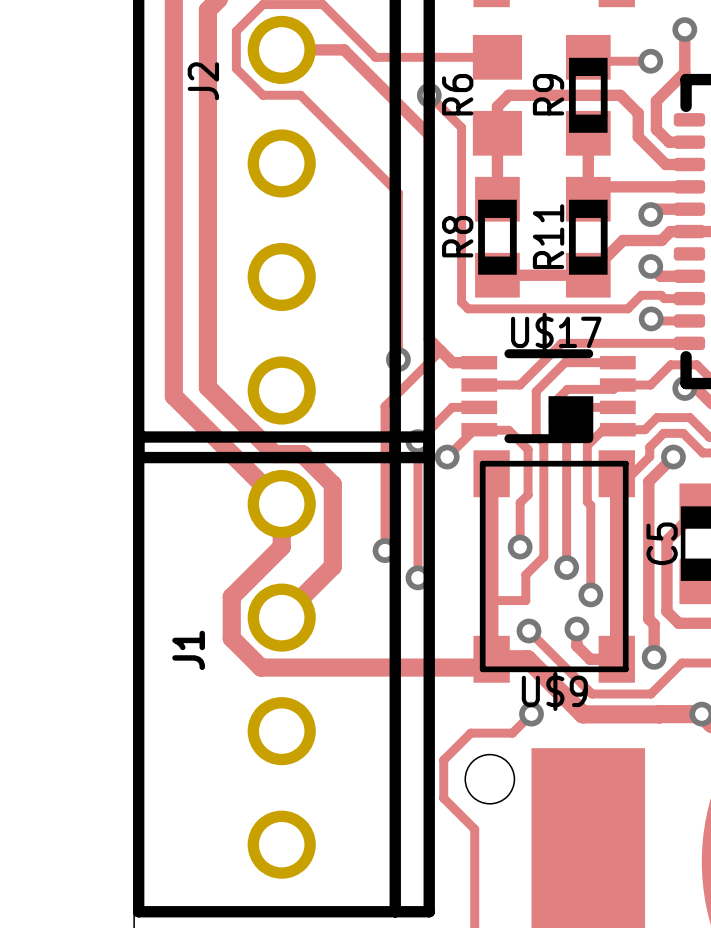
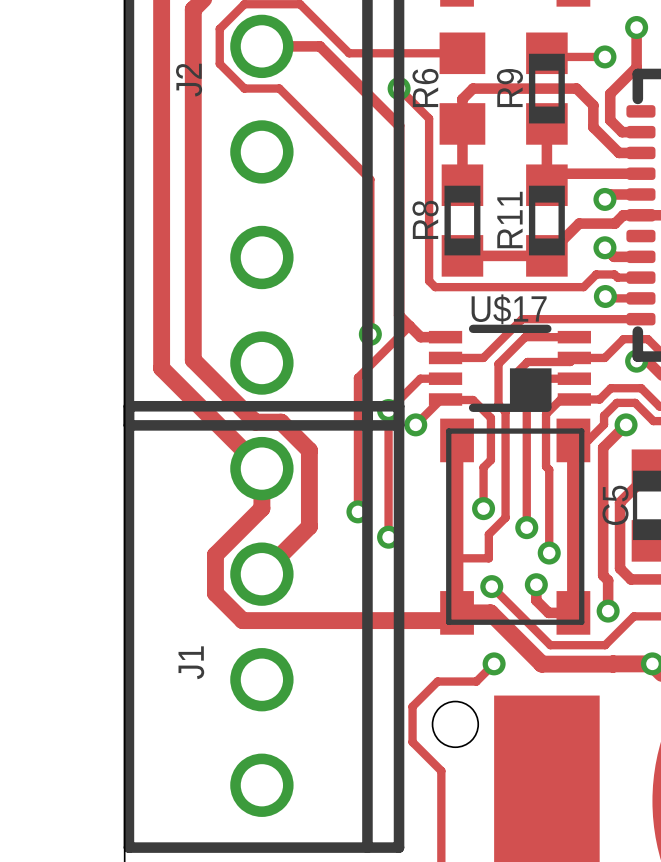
J1 name position: J1 (188, 650) -> J1 (191, 662)
U$9 name: U$9 (554, 691) -> none

